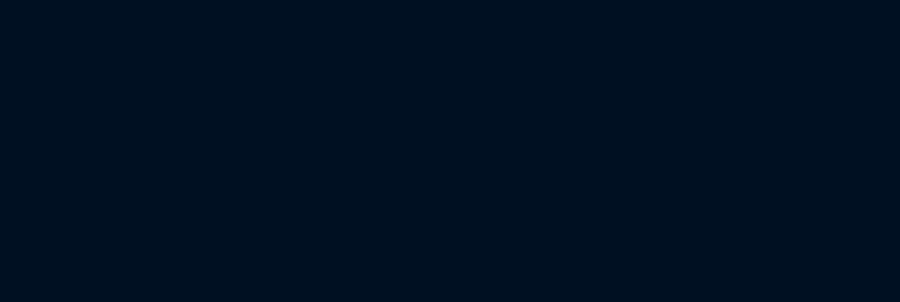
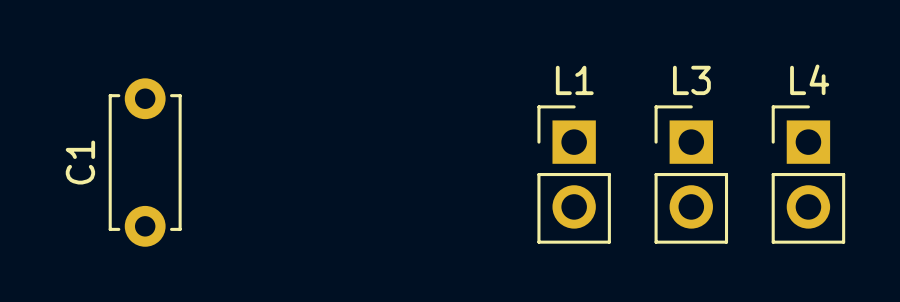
C1: none -> (145, 162)
L1: none -> (574, 174)
L3: none -> (691, 174)
L4: none -> (808, 174)

